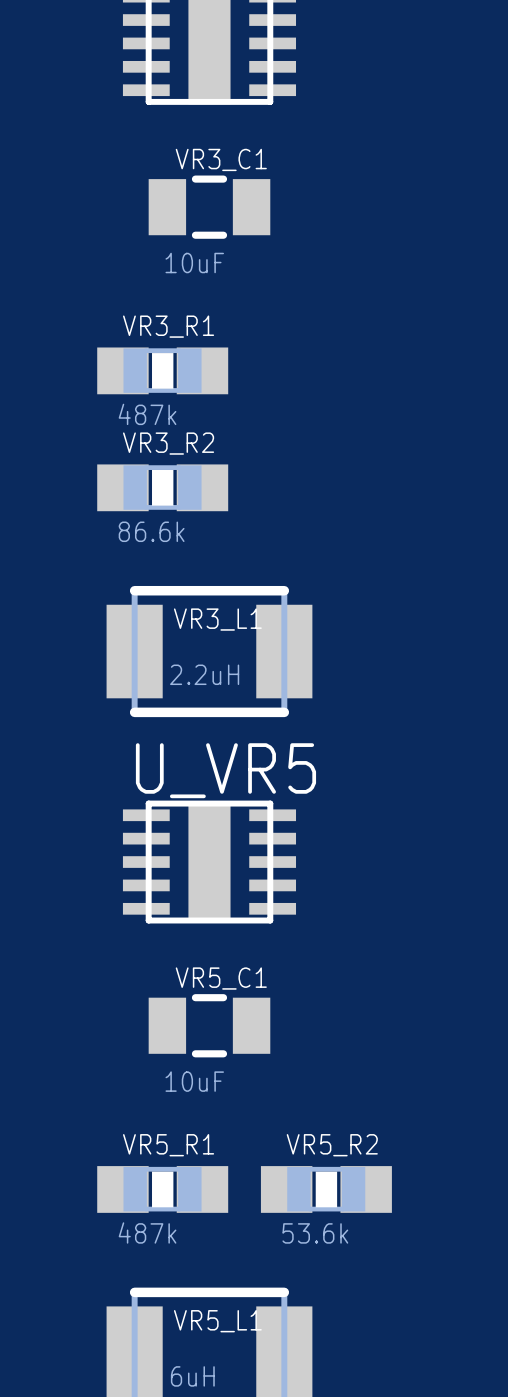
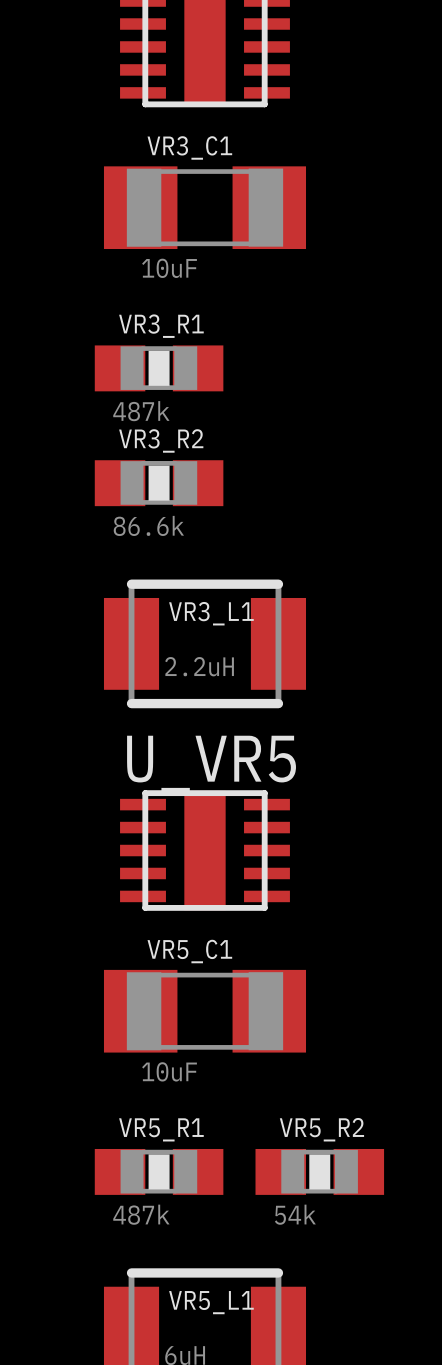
VR3_C1 footprint: [148, 175, 271, 239] -> [103, 166, 307, 250]
VR5_C1 footprint: [148, 994, 271, 1058] -> [103, 969, 307, 1053]
VR5_R2 value: 53.6k (315, 1233) -> 54k (295, 1214)

